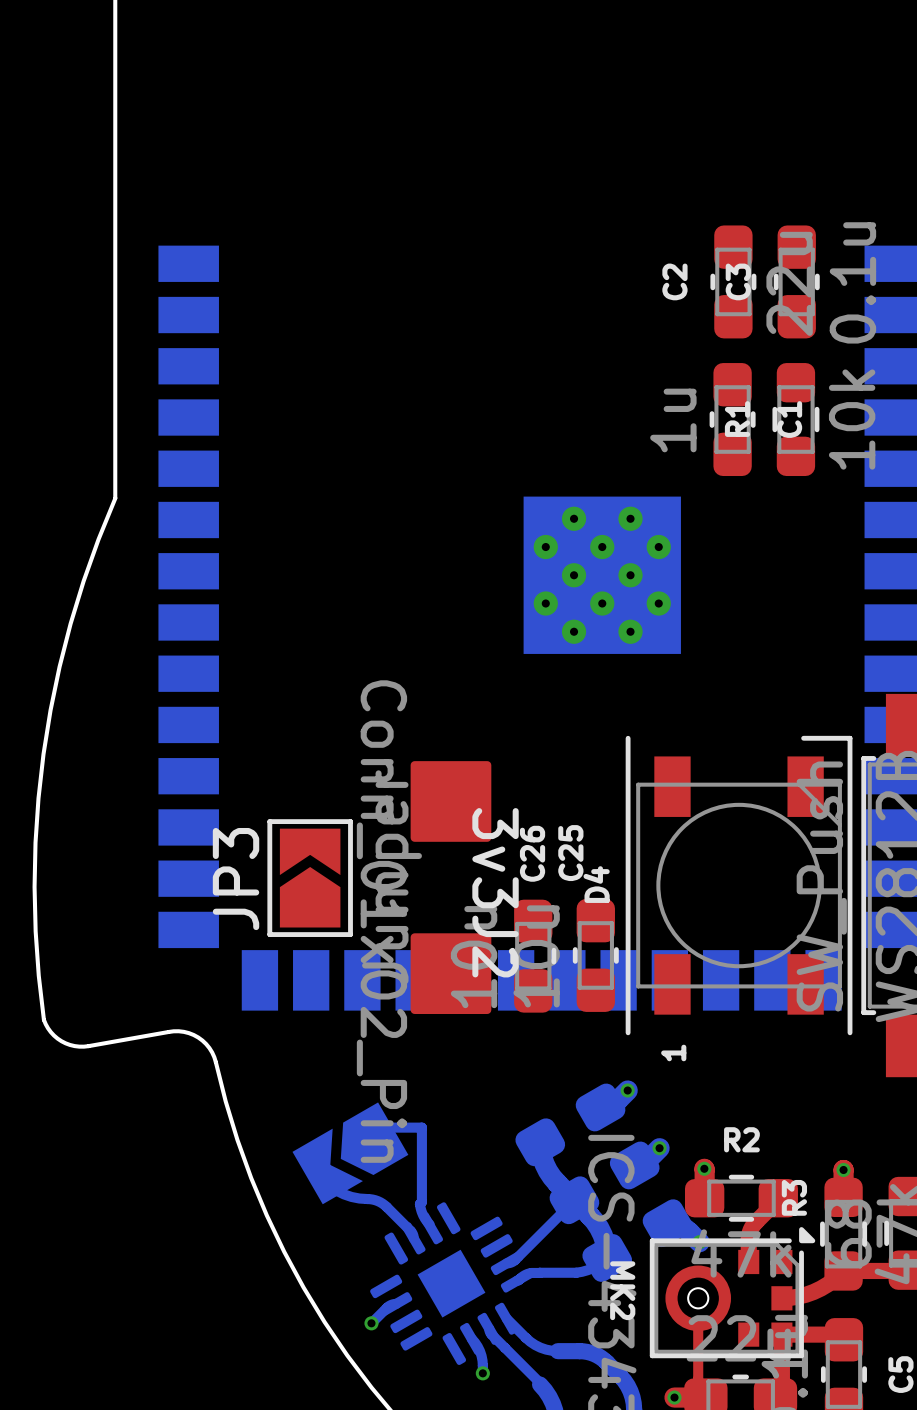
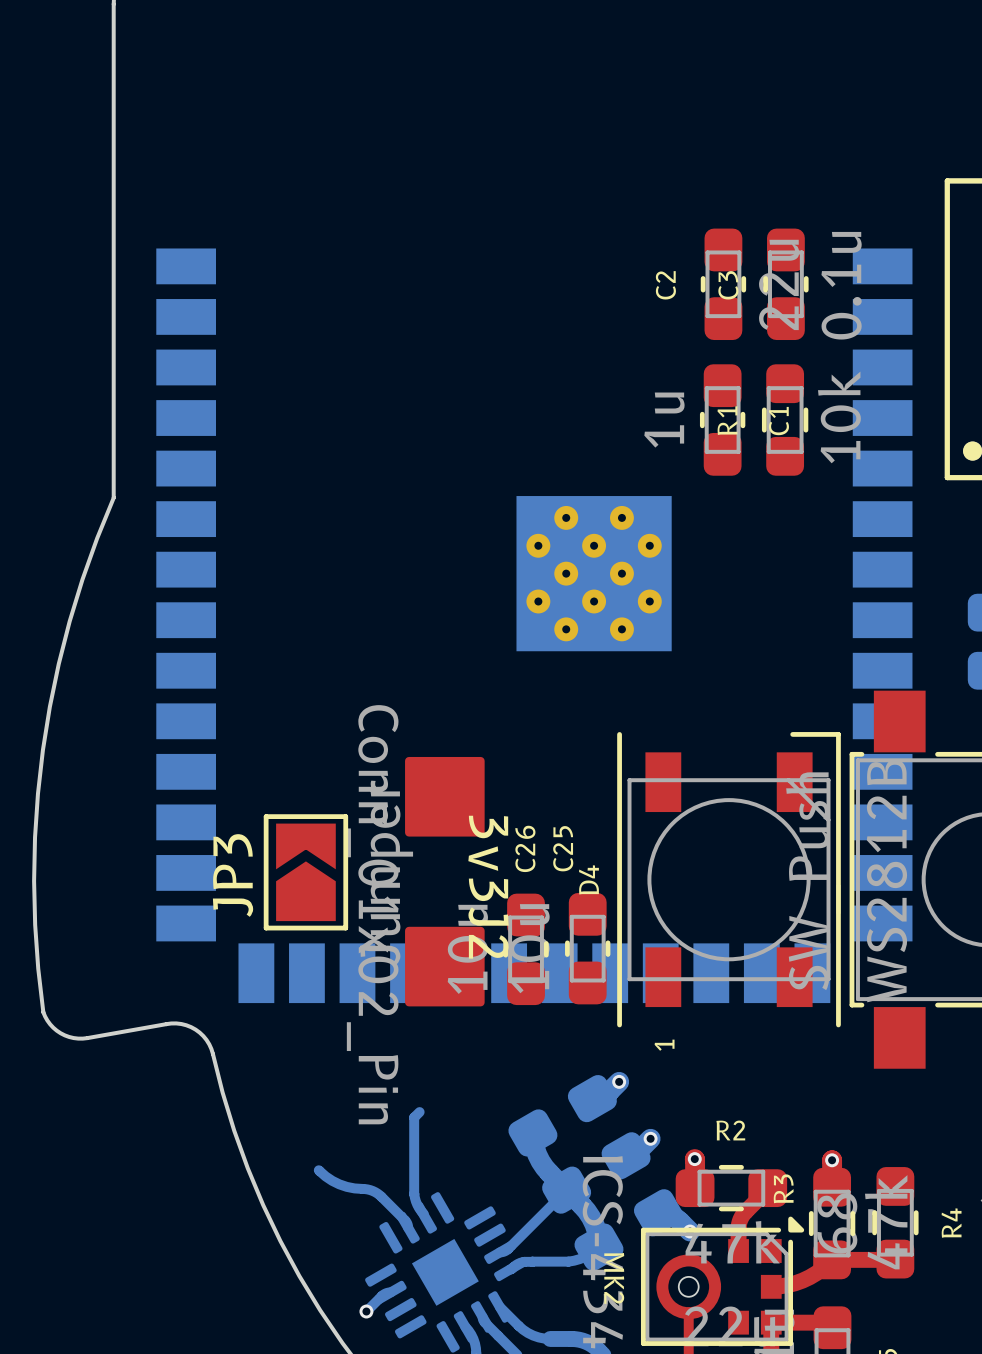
bottom track: (375, 1138) (386, 1127) (421, 1127) (421, 1202) (419, 1204) -> (419, 1112) (414, 1117) (414, 1193)
part: (350, 1153) -> none

